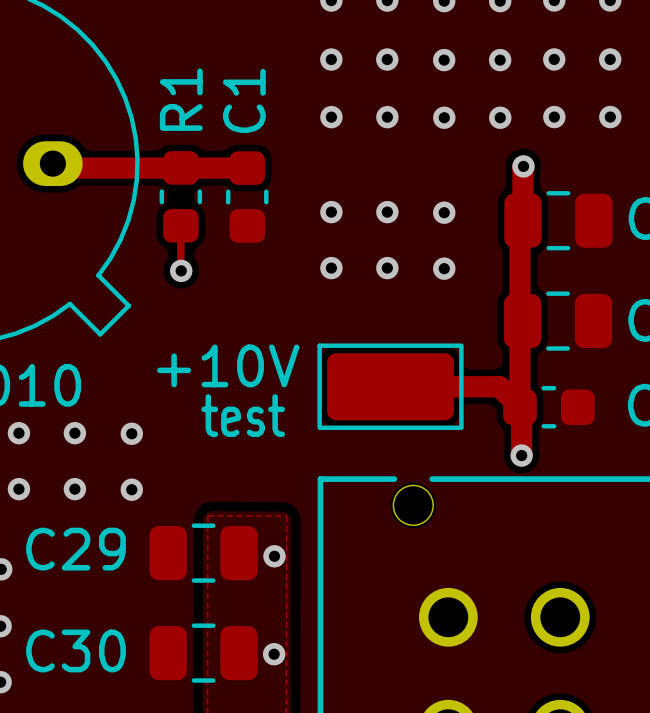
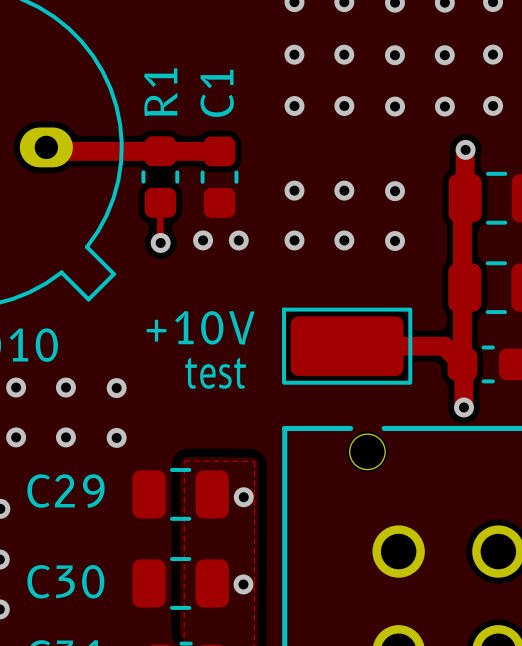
via: none -> (203, 240)
via: none -> (238, 240)

